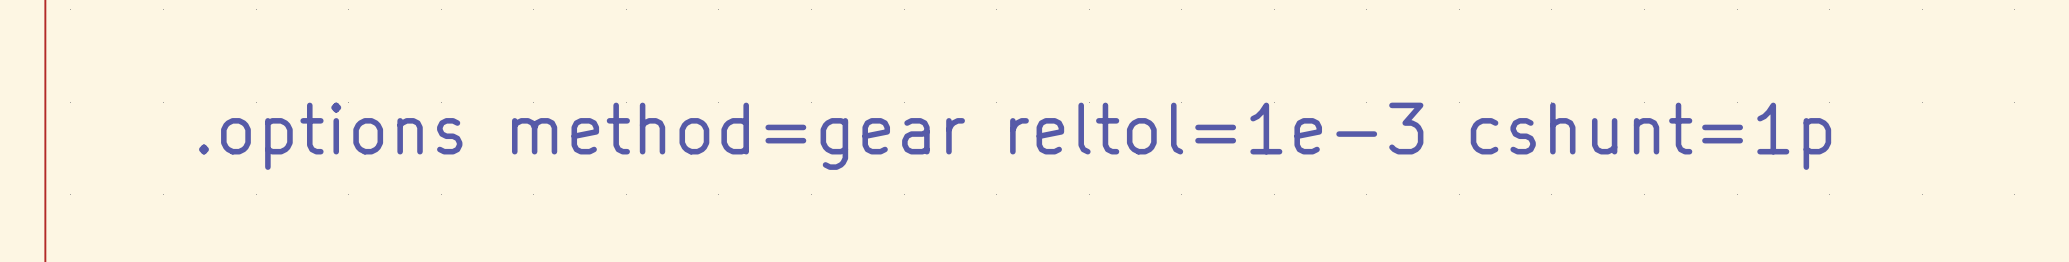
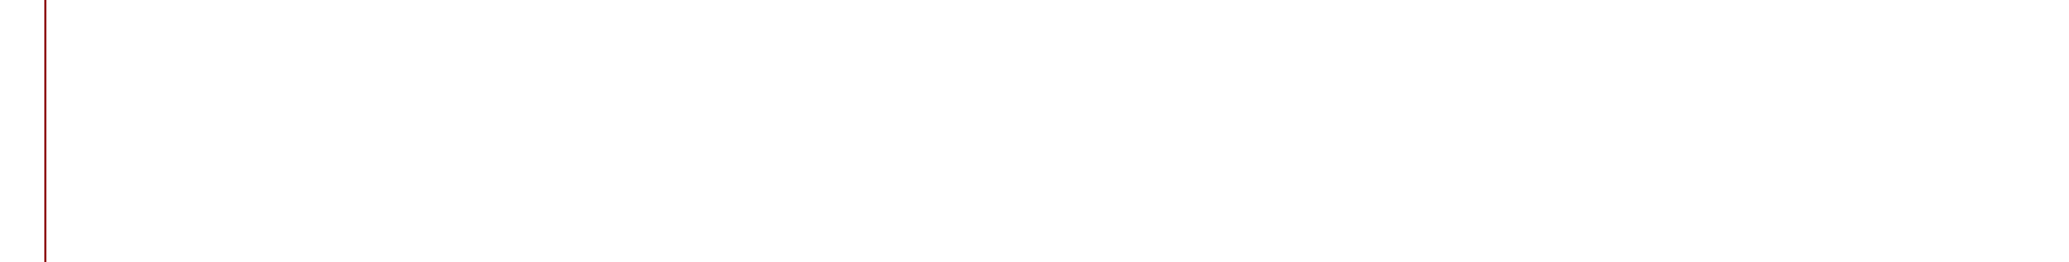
text: .options method=gear reltol=1e-3 cshunt=1p (1015, 136) -> none

